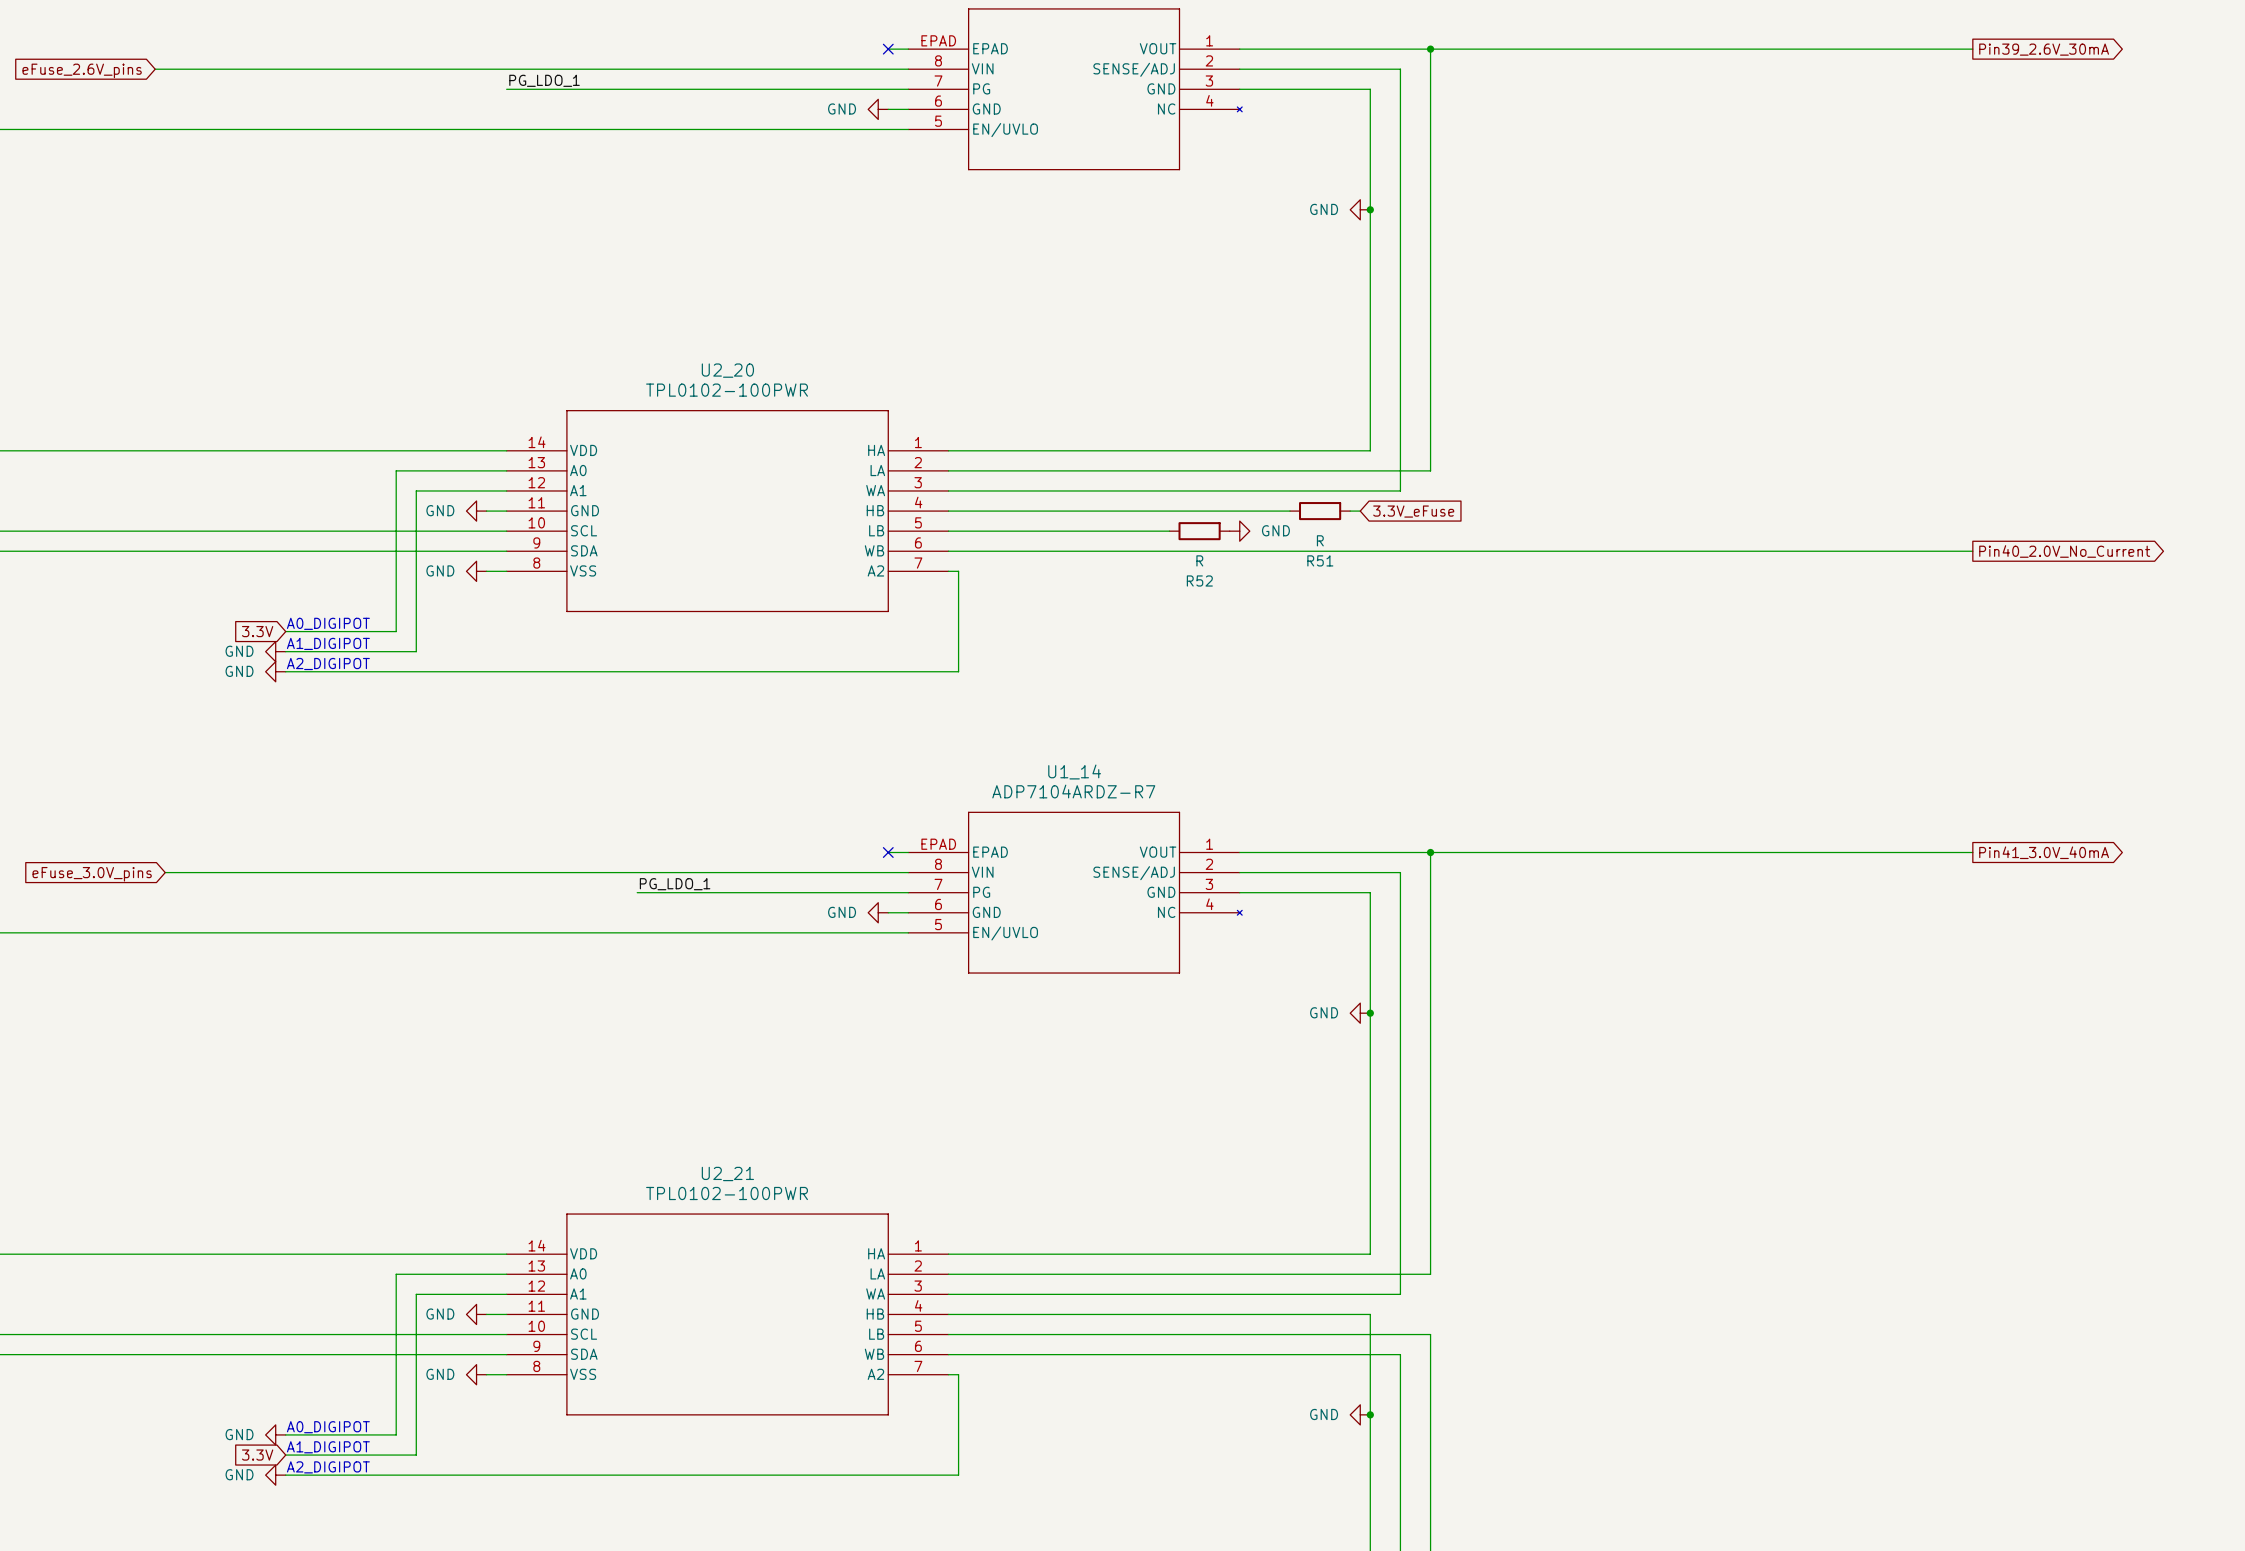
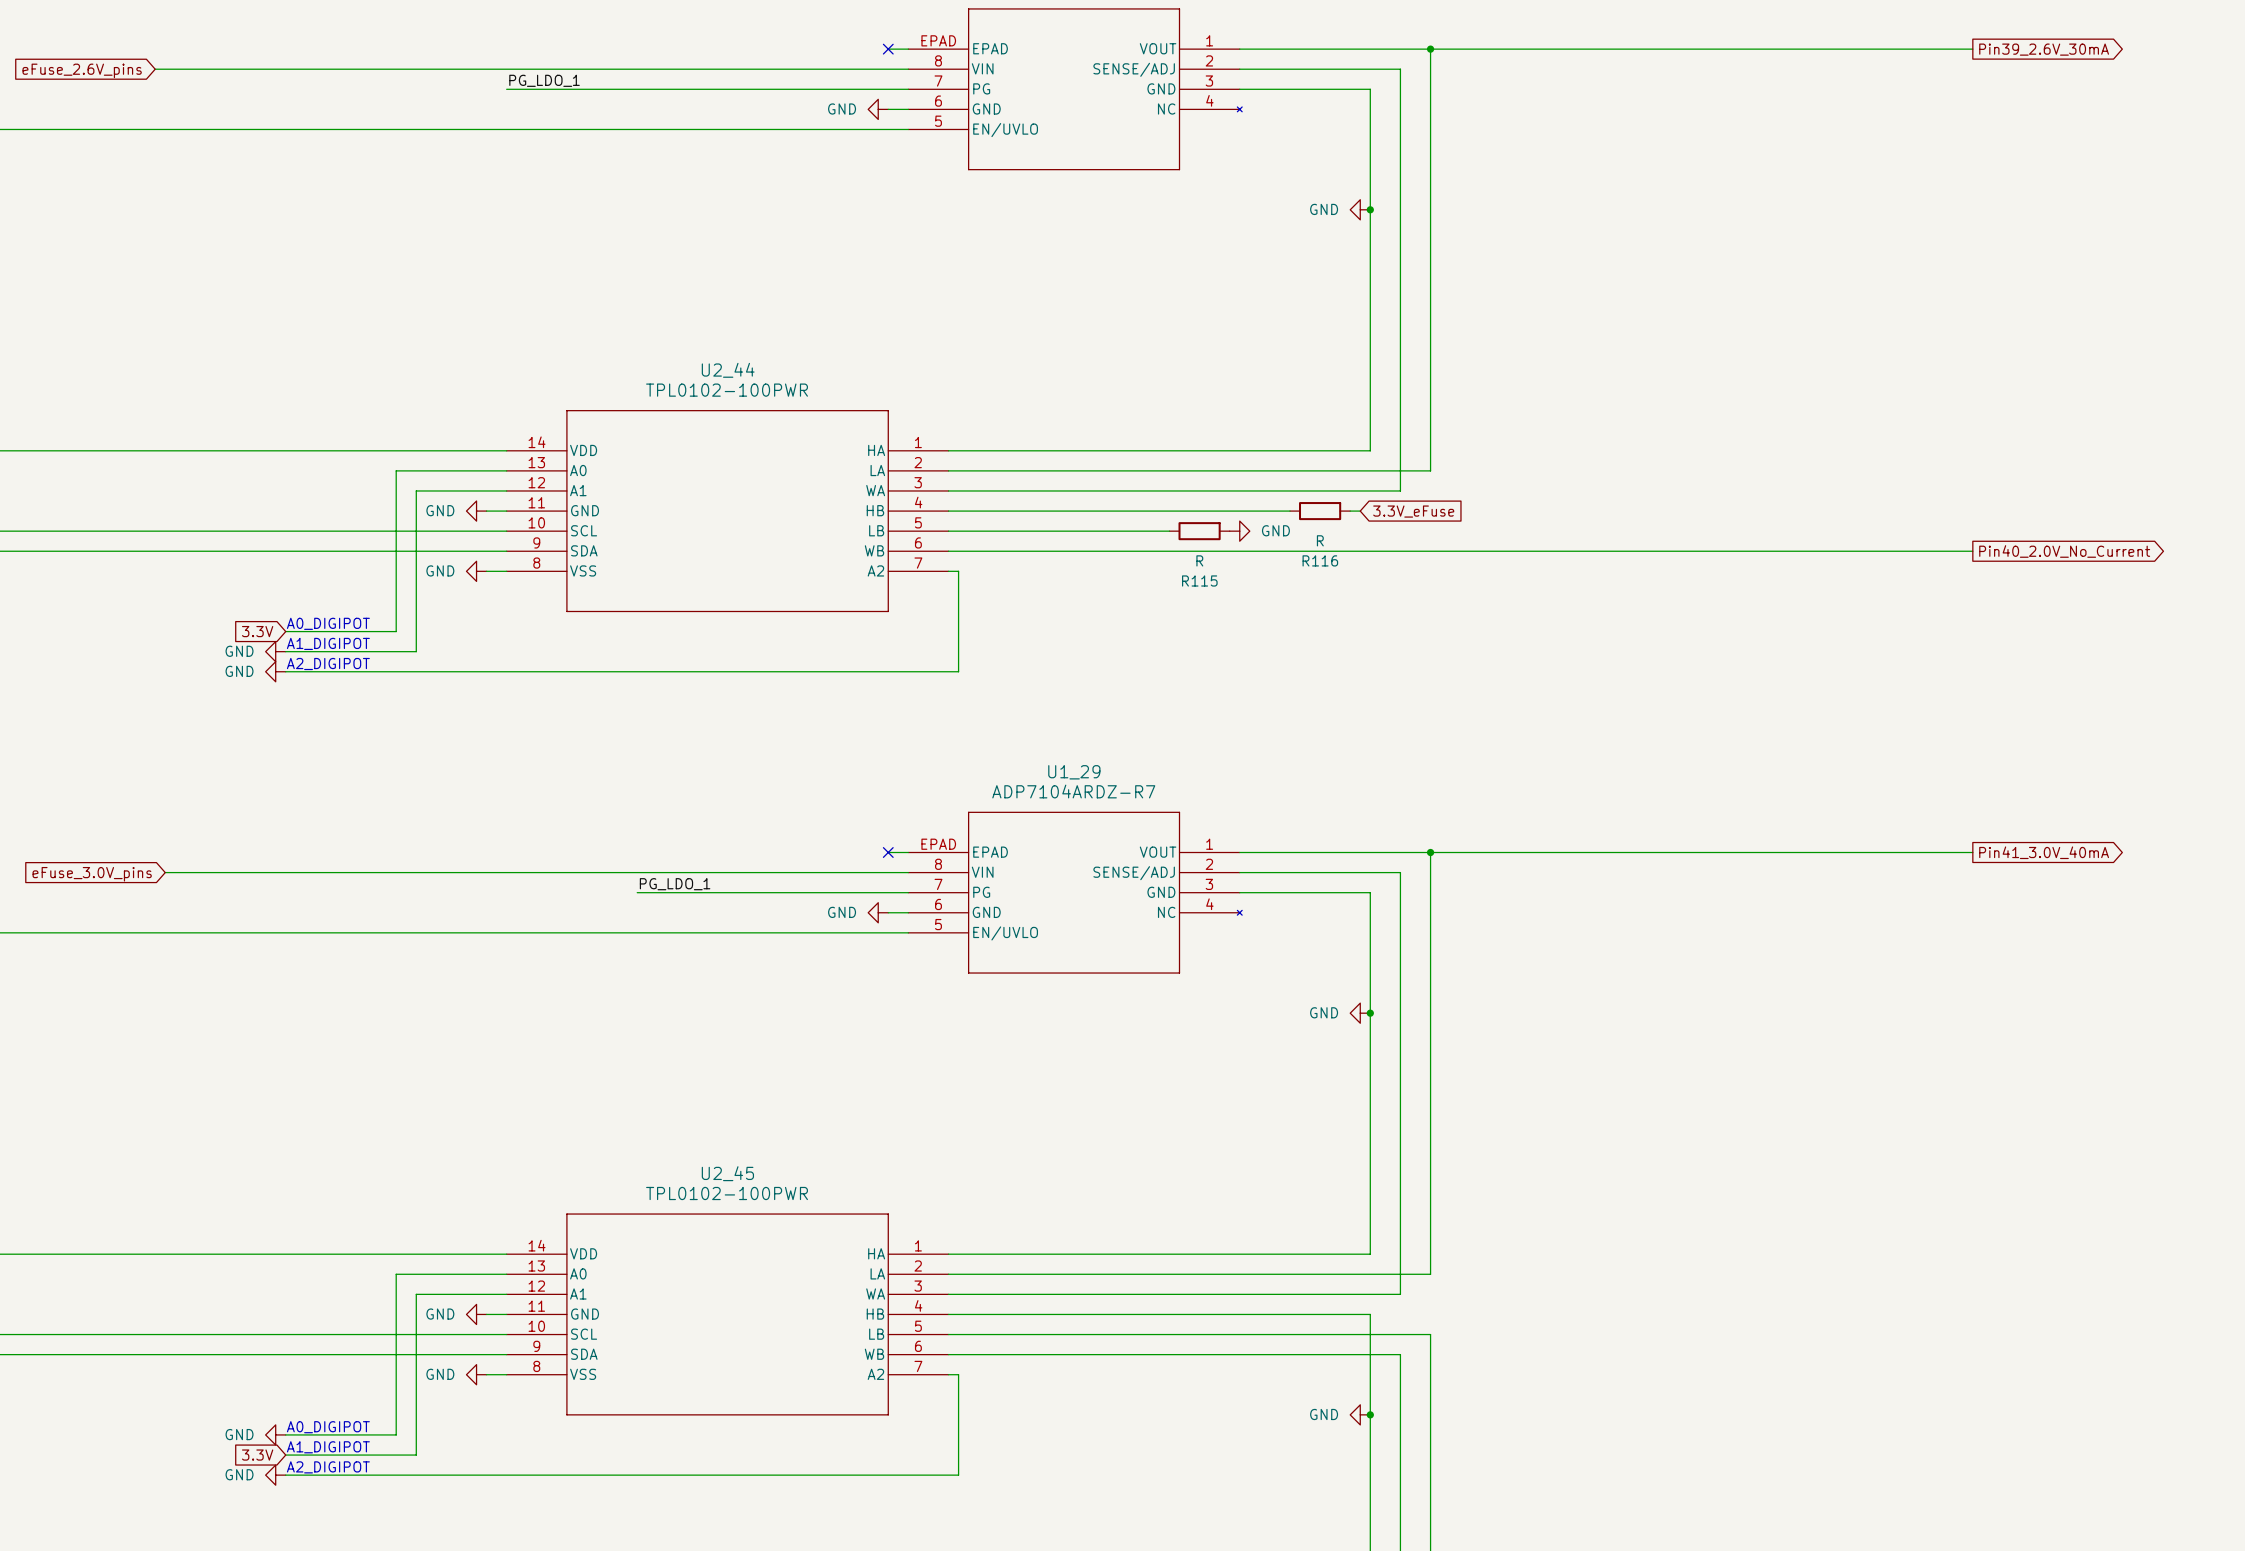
U2_20 name: U2_20 (727, 370) -> U2_44 (728, 370)
R51 name: R51 (1320, 560) -> R116 (1320, 560)
R52 name: R52 (1199, 580) -> R115 (1199, 580)
U1_14 name: U1_14 (1074, 772) -> U1_29 (1074, 772)
U2_21 name: U2_21 (727, 1173) -> U2_45 (727, 1173)

